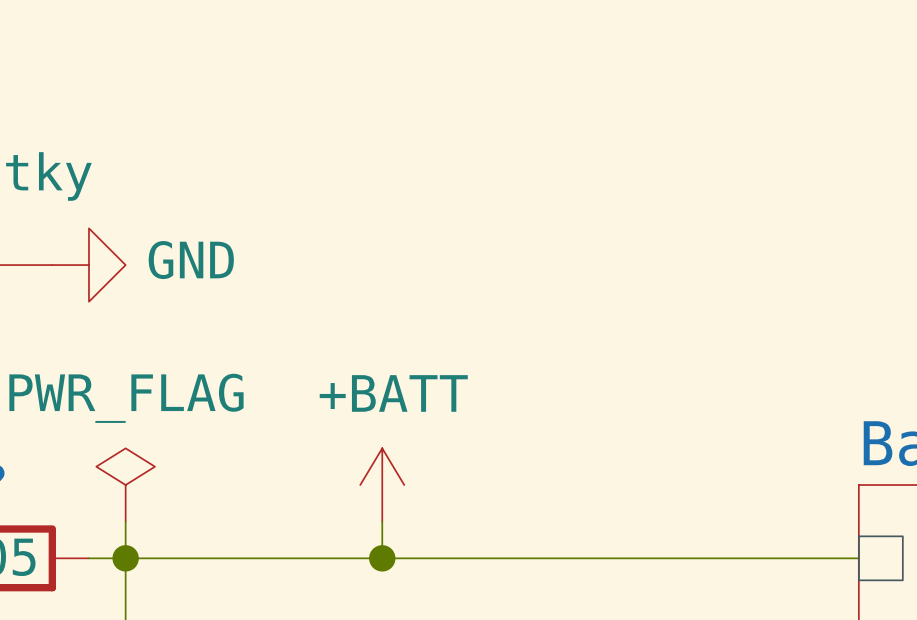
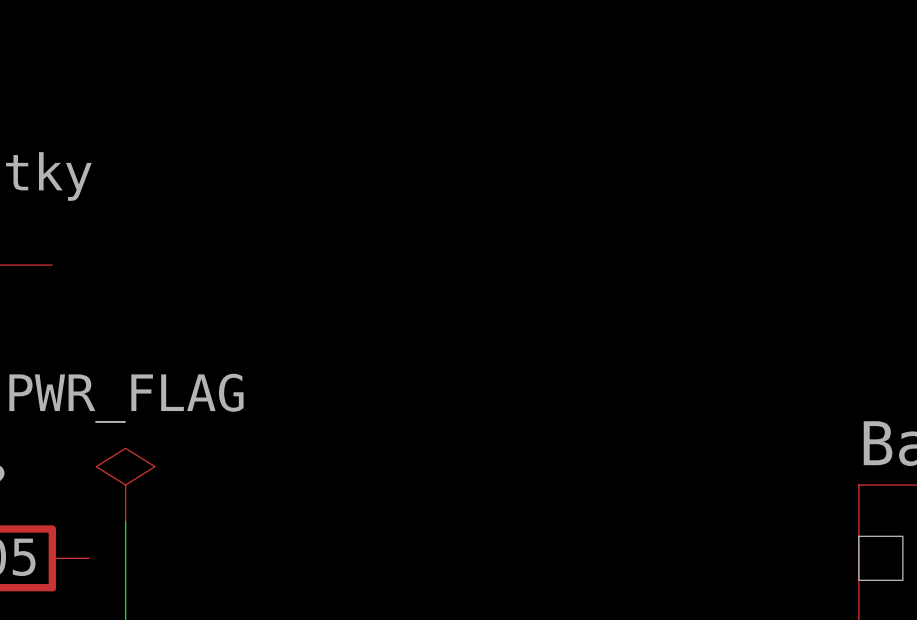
power symbol: GND (88, 265) -> none
power symbol: +BATT (382, 485) -> none
wire: (382, 521) (382, 558) -> none
wire: (88, 558) (858, 558) -> none
junction: (125, 558) -> none
junction: (382, 558) -> none

